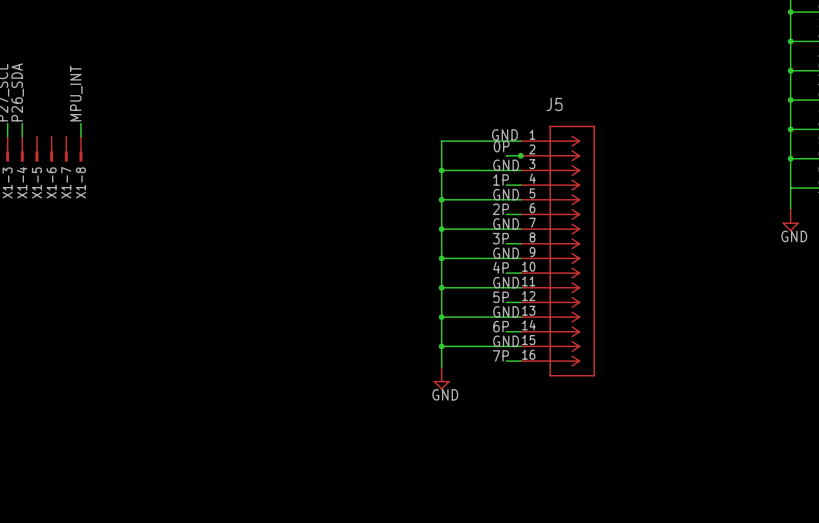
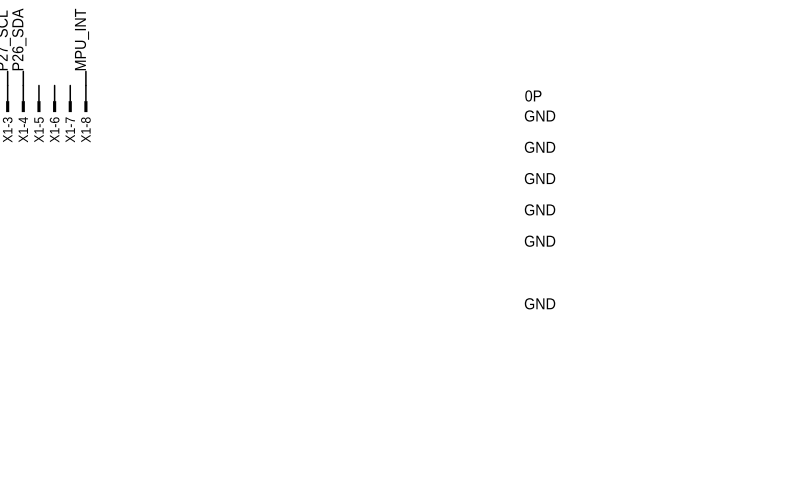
label: GND (504, 134) -> none
wire: (520, 141) (441, 141) (441, 366) -> none
junction: (520, 155) -> none
wire: (521, 155) (506, 156) -> none
wire: (441, 170) (520, 170) -> none
junction: (441, 170) -> none
label: 1P (501, 179) -> none
wire: (506, 185) (520, 185) -> none
wire: (441, 199) (520, 199) -> none
junction: (441, 199) -> none
label: 2P (500, 209) -> none
wire: (506, 214) (520, 214) -> none
wire: (441, 229) (520, 229) -> none
junction: (441, 229) -> none
label: 3P (500, 238) -> none
wire: (506, 243) (520, 243) -> none
J5: (557, 251) -> none
wire: (441, 258) (520, 258) -> none
junction: (441, 258) -> none
label: 4P (501, 267) -> none
wire: (506, 273) (520, 273) -> none
wire: (441, 287) (520, 287) -> none
junction: (441, 287) -> none
label: 5P (501, 297) -> none
wire: (506, 302) (520, 302) -> none
label: GND (506, 311) -> none
wire: (441, 317) (520, 317) -> none
junction: (441, 317) -> none
label: 6P (501, 326) -> none
wire: (506, 331) (520, 331) -> none
wire: (441, 346) (520, 346) -> none
junction: (441, 346) -> none
label: 7P (500, 355) -> none
wire: (506, 361) (520, 361) -> none
power symbol: GND (441, 378) -> none

